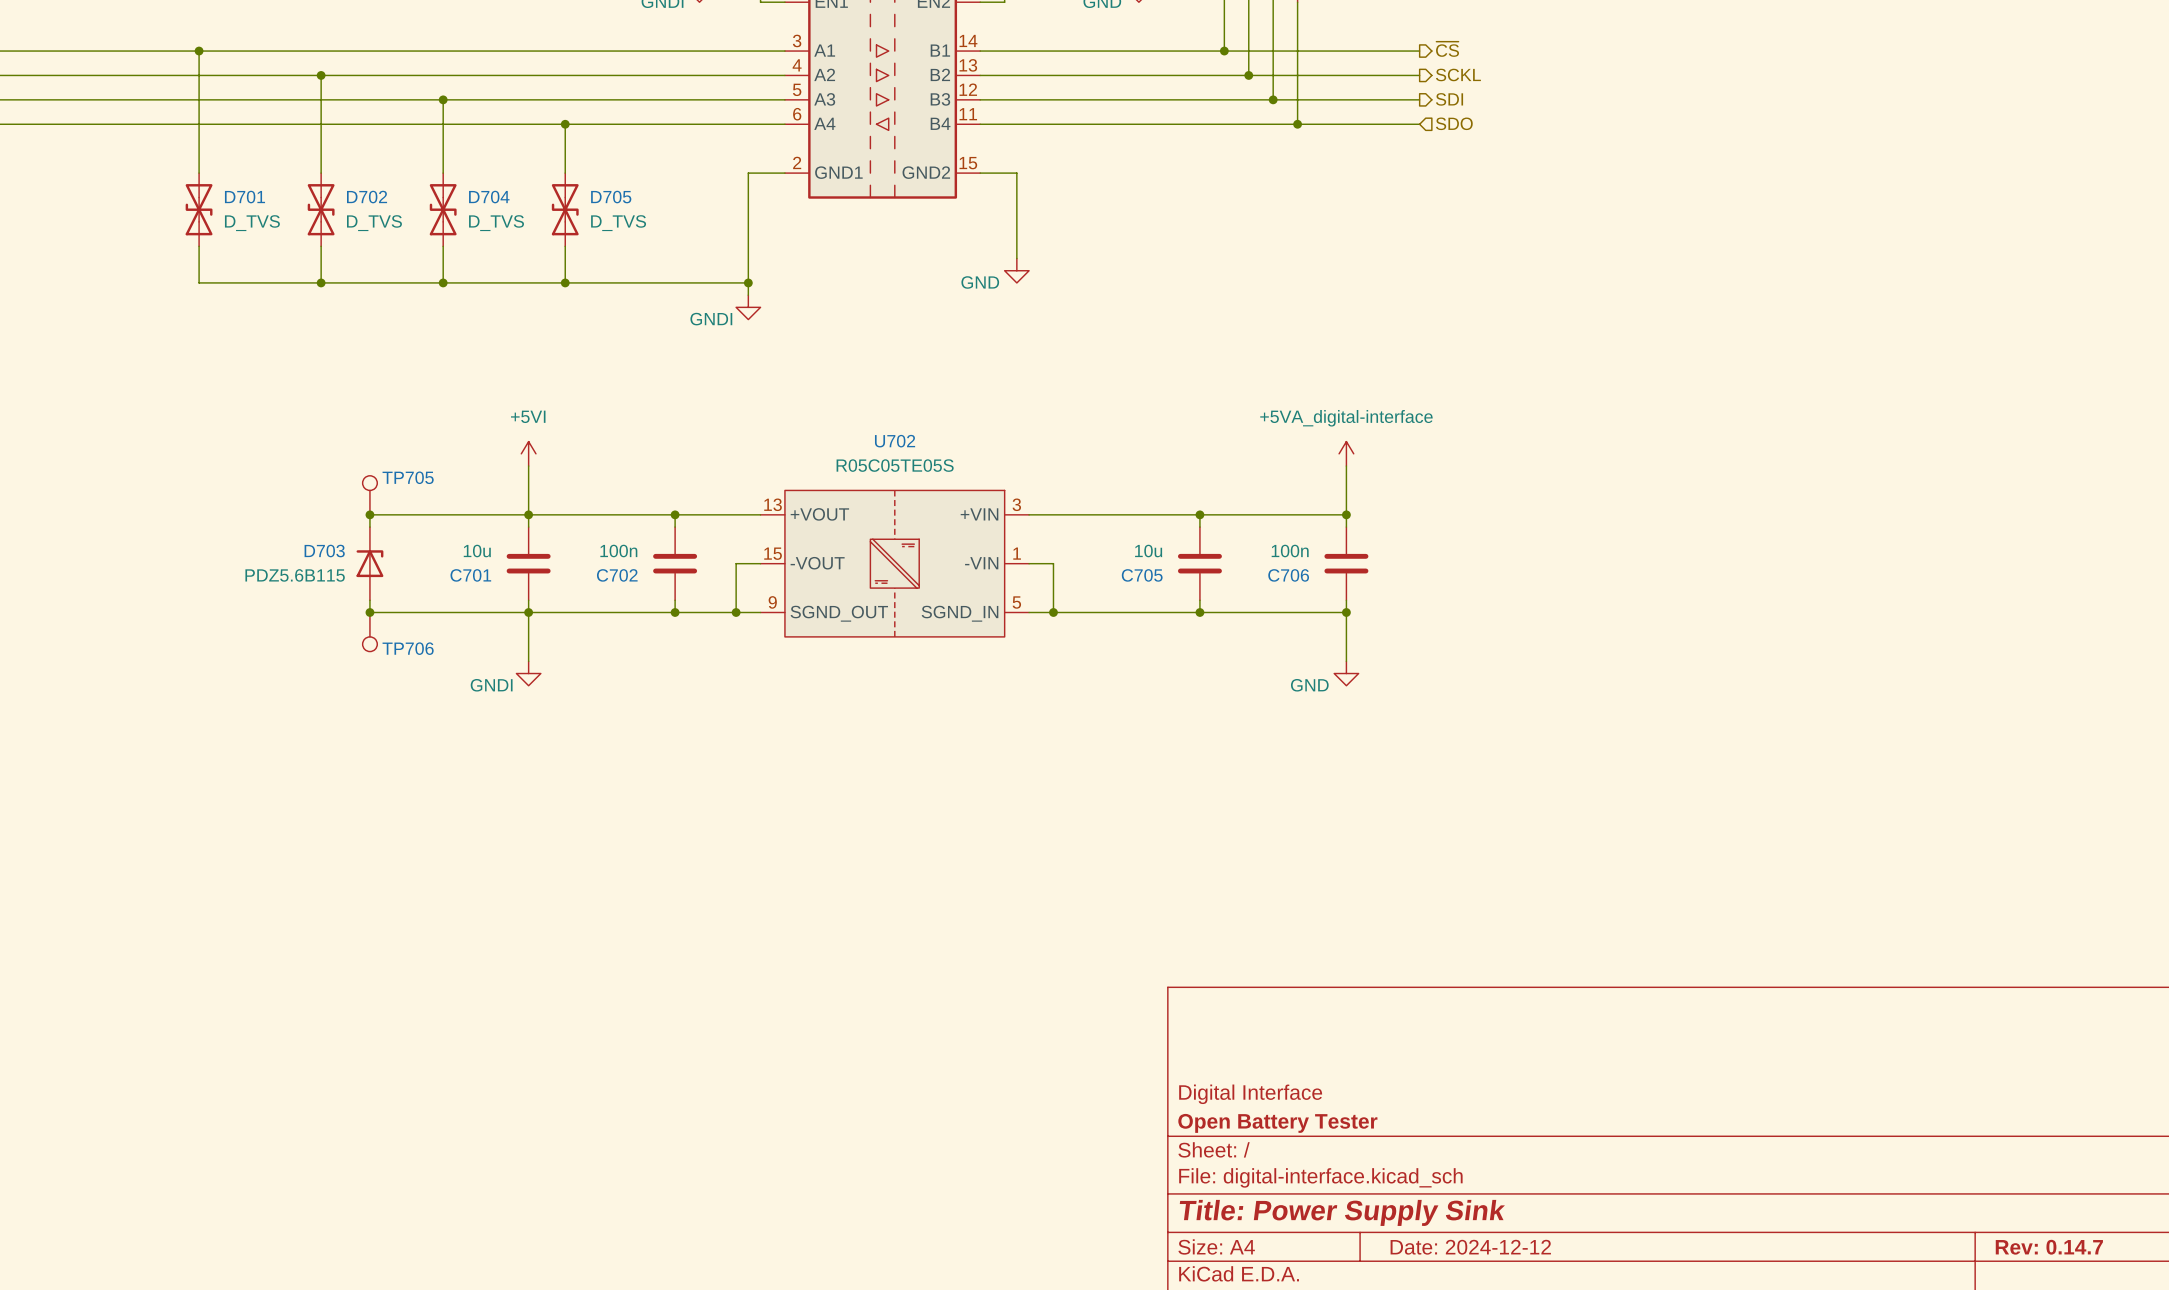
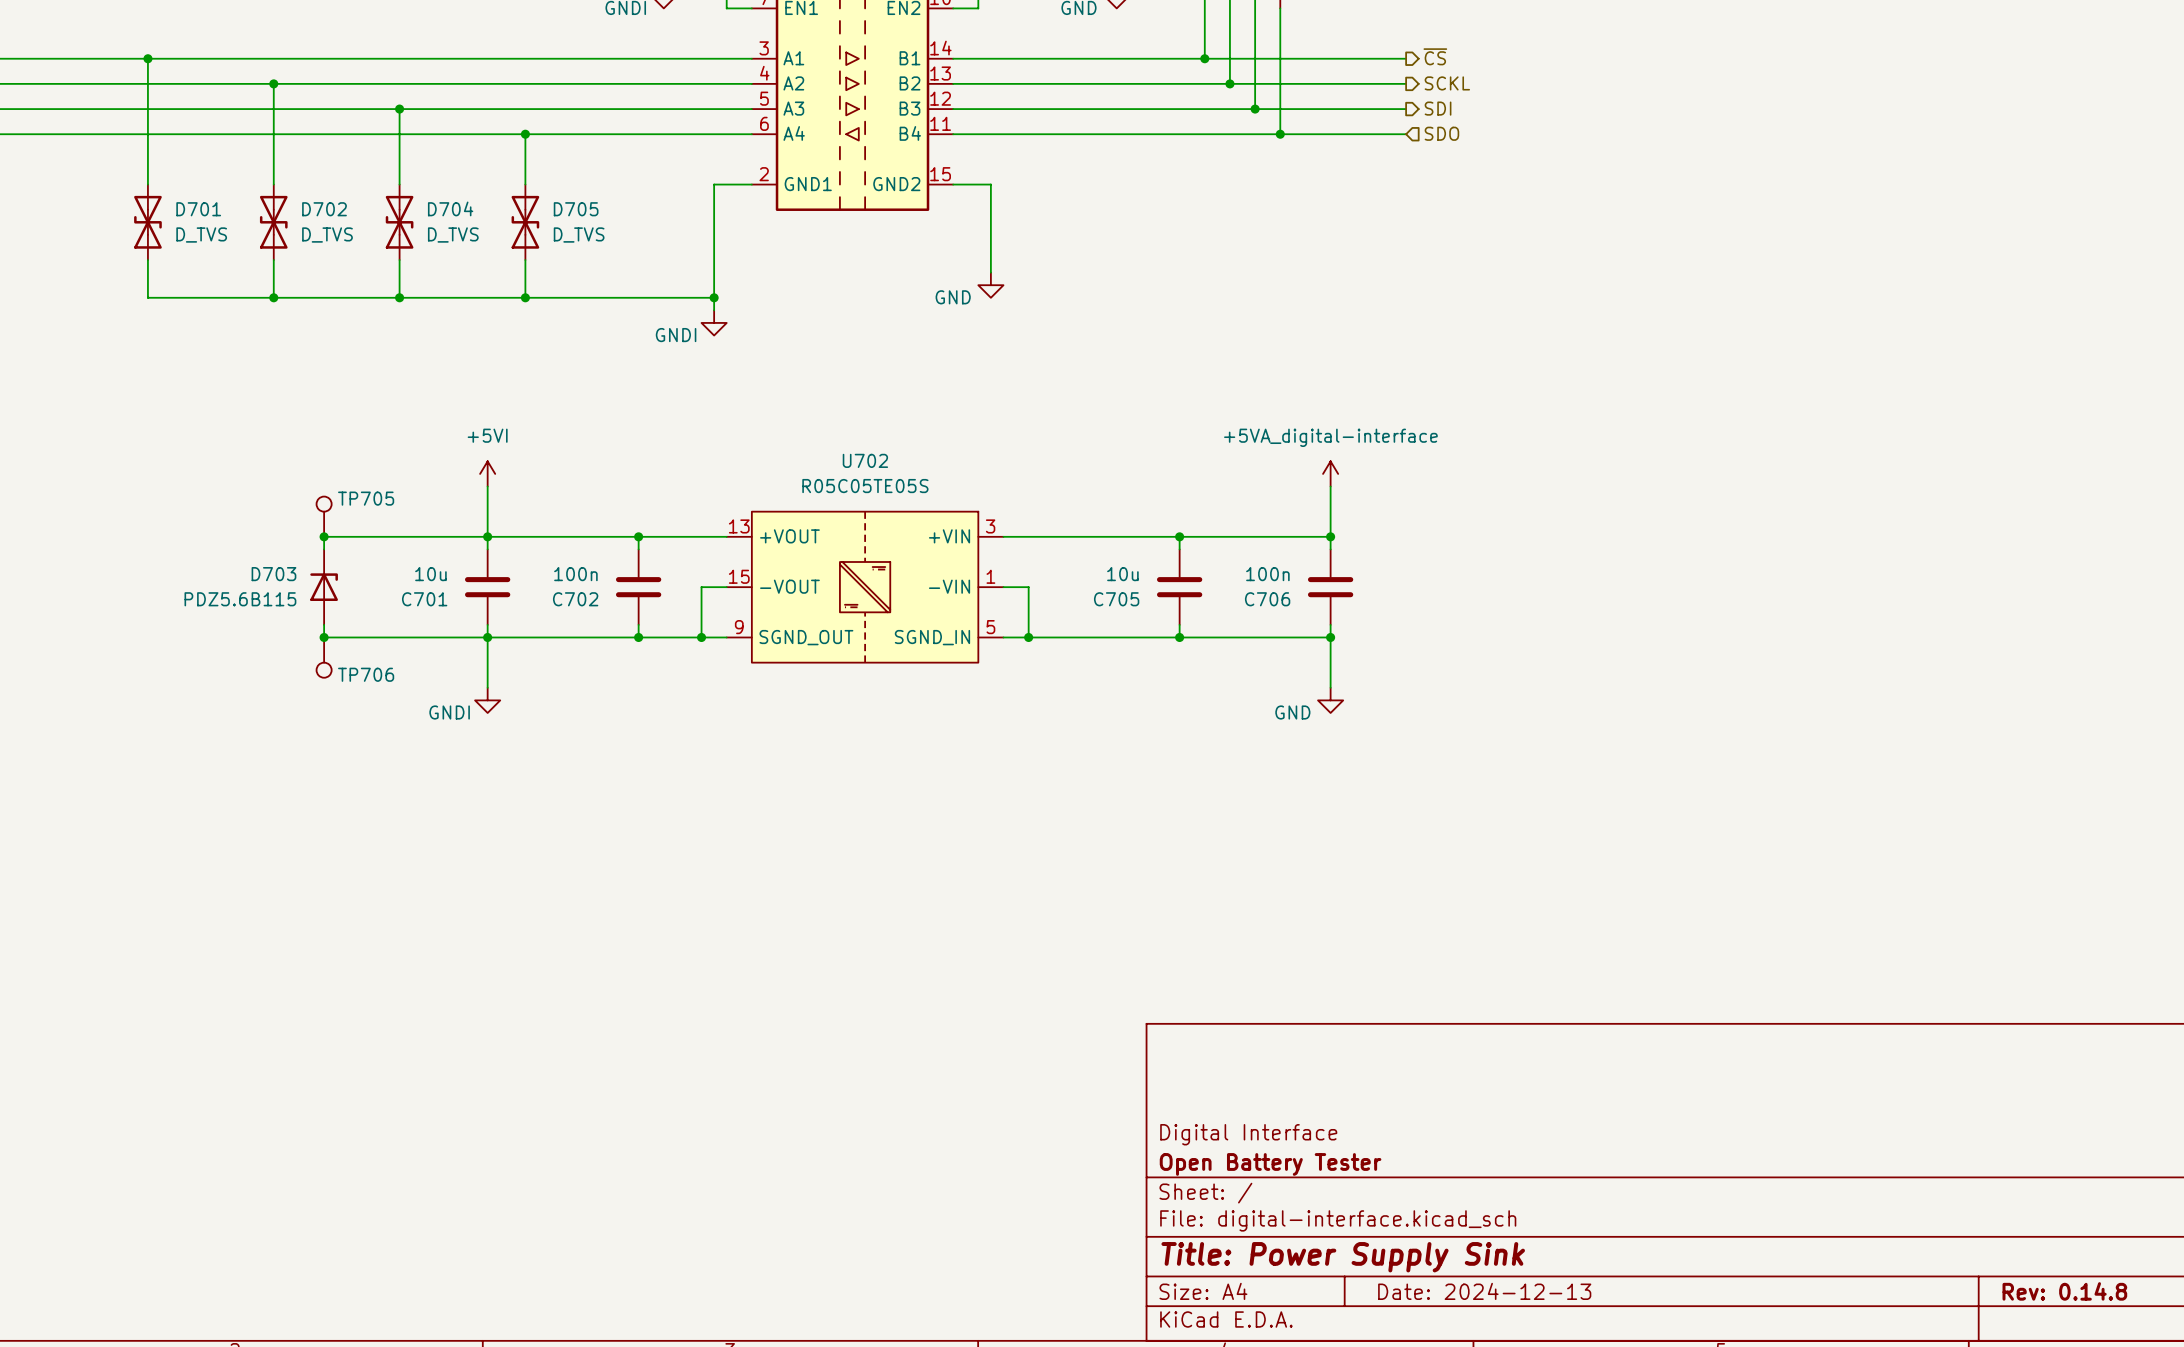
title block: Date: 2024-12-12 (1470, 1247) -> Date: 2024-12-13 (1484, 1291)
title block: Rev: 0.14.7 (2049, 1247) -> Rev: 0.14.8 (2064, 1291)

